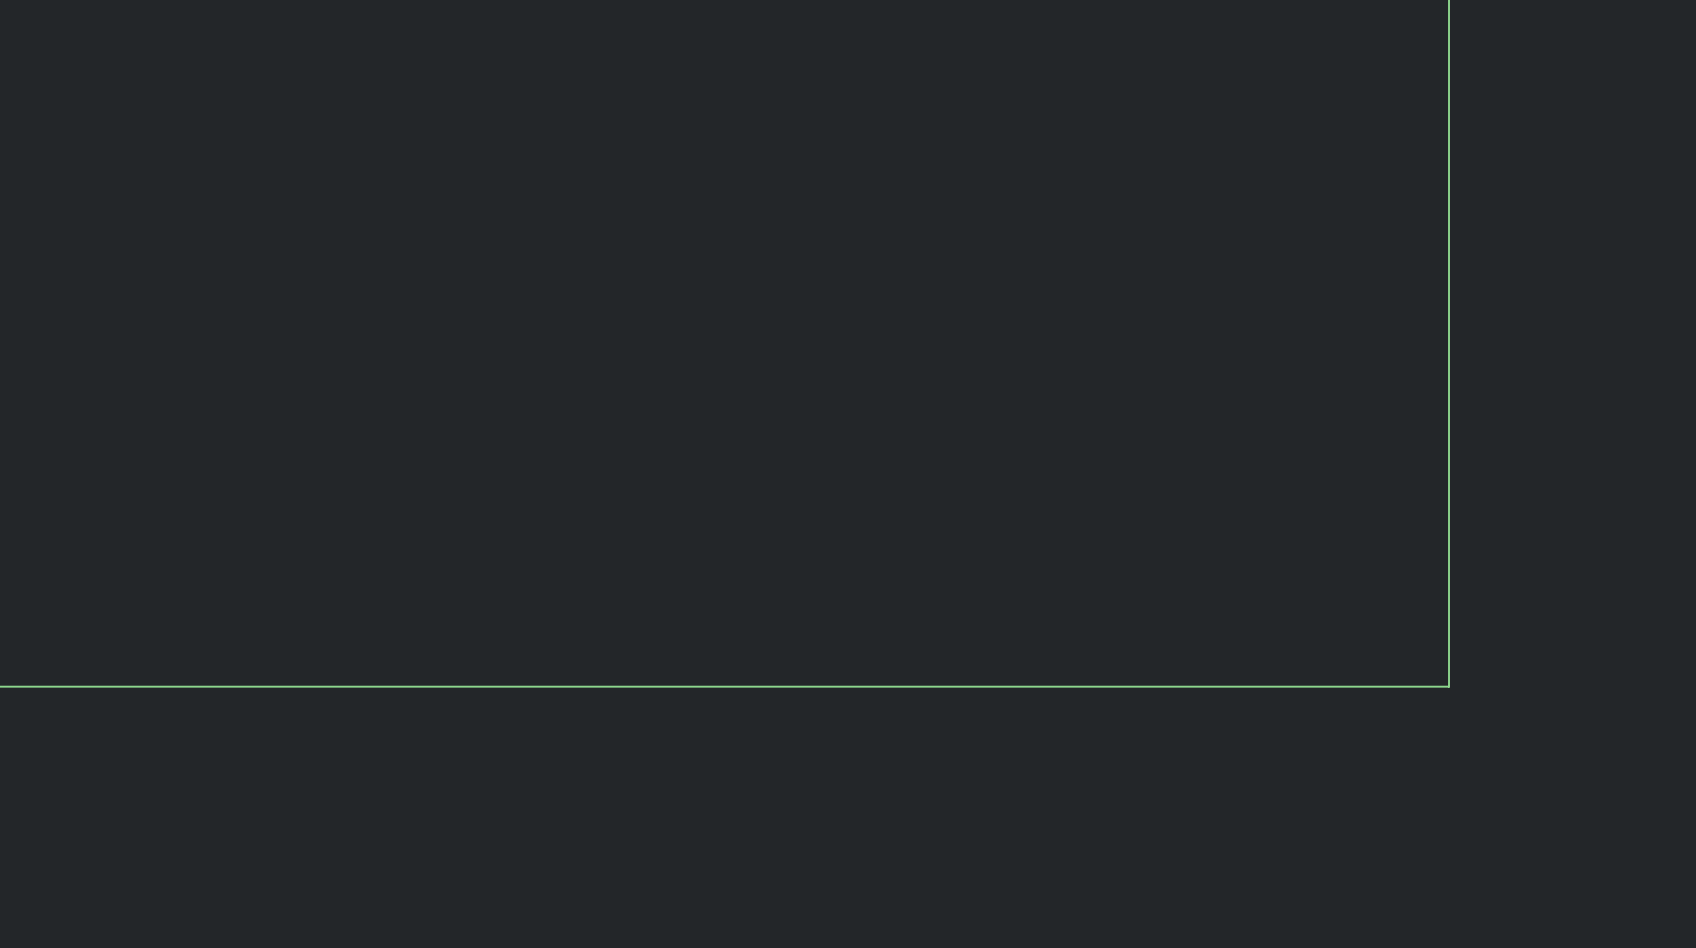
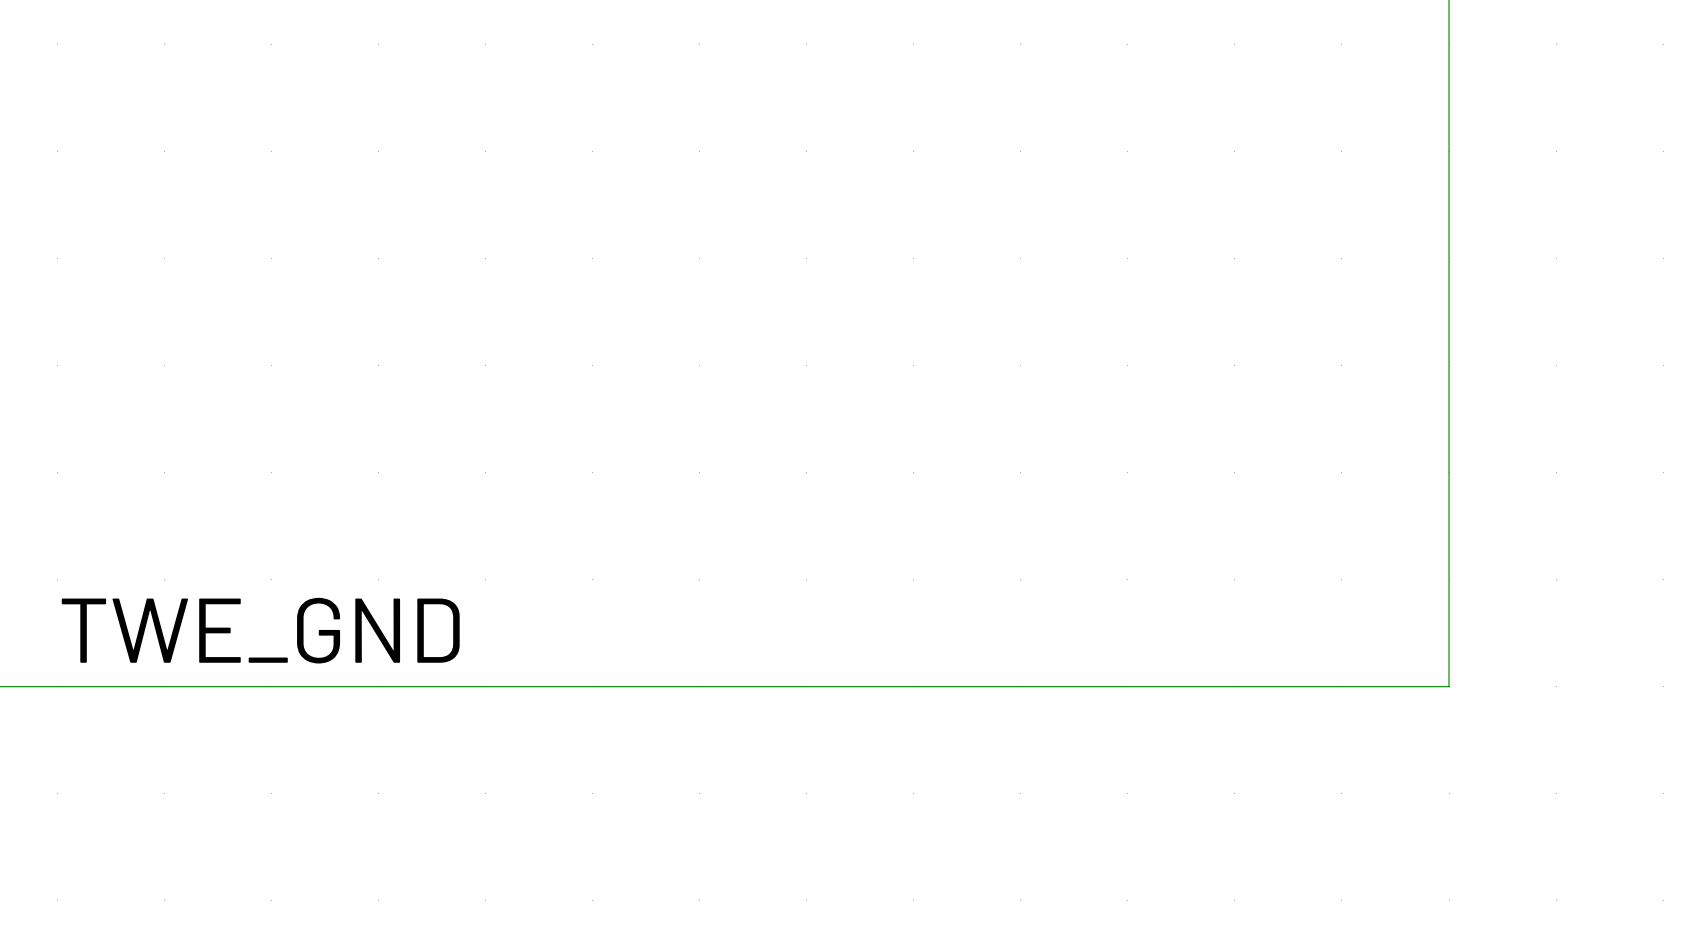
label: none -> TWE_GND (260, 630)

